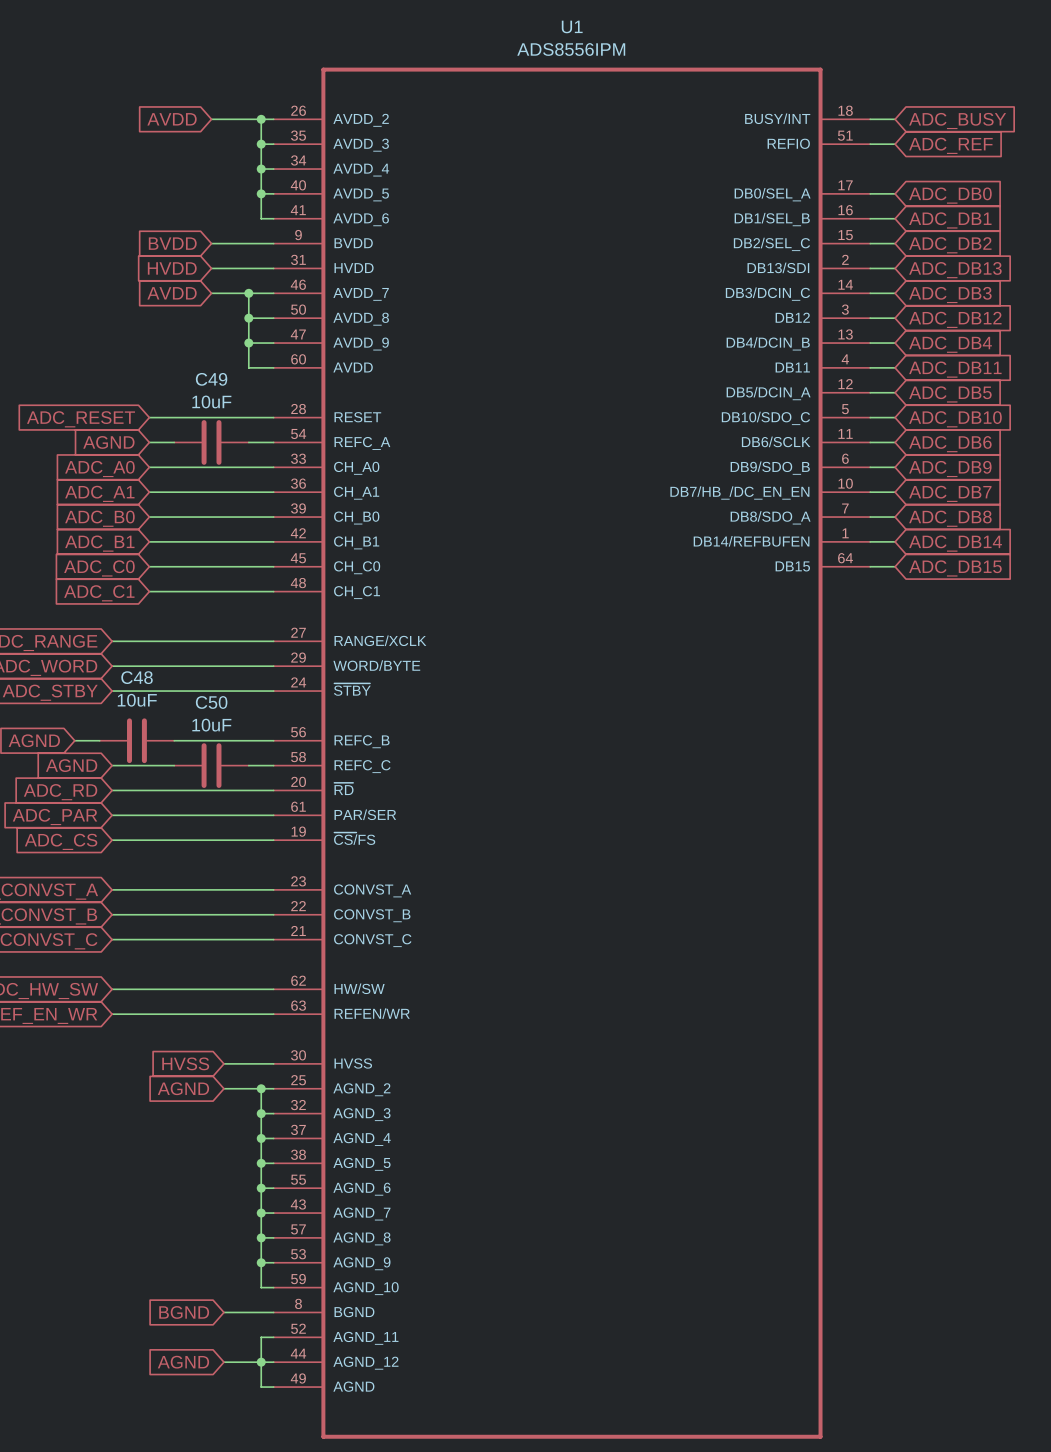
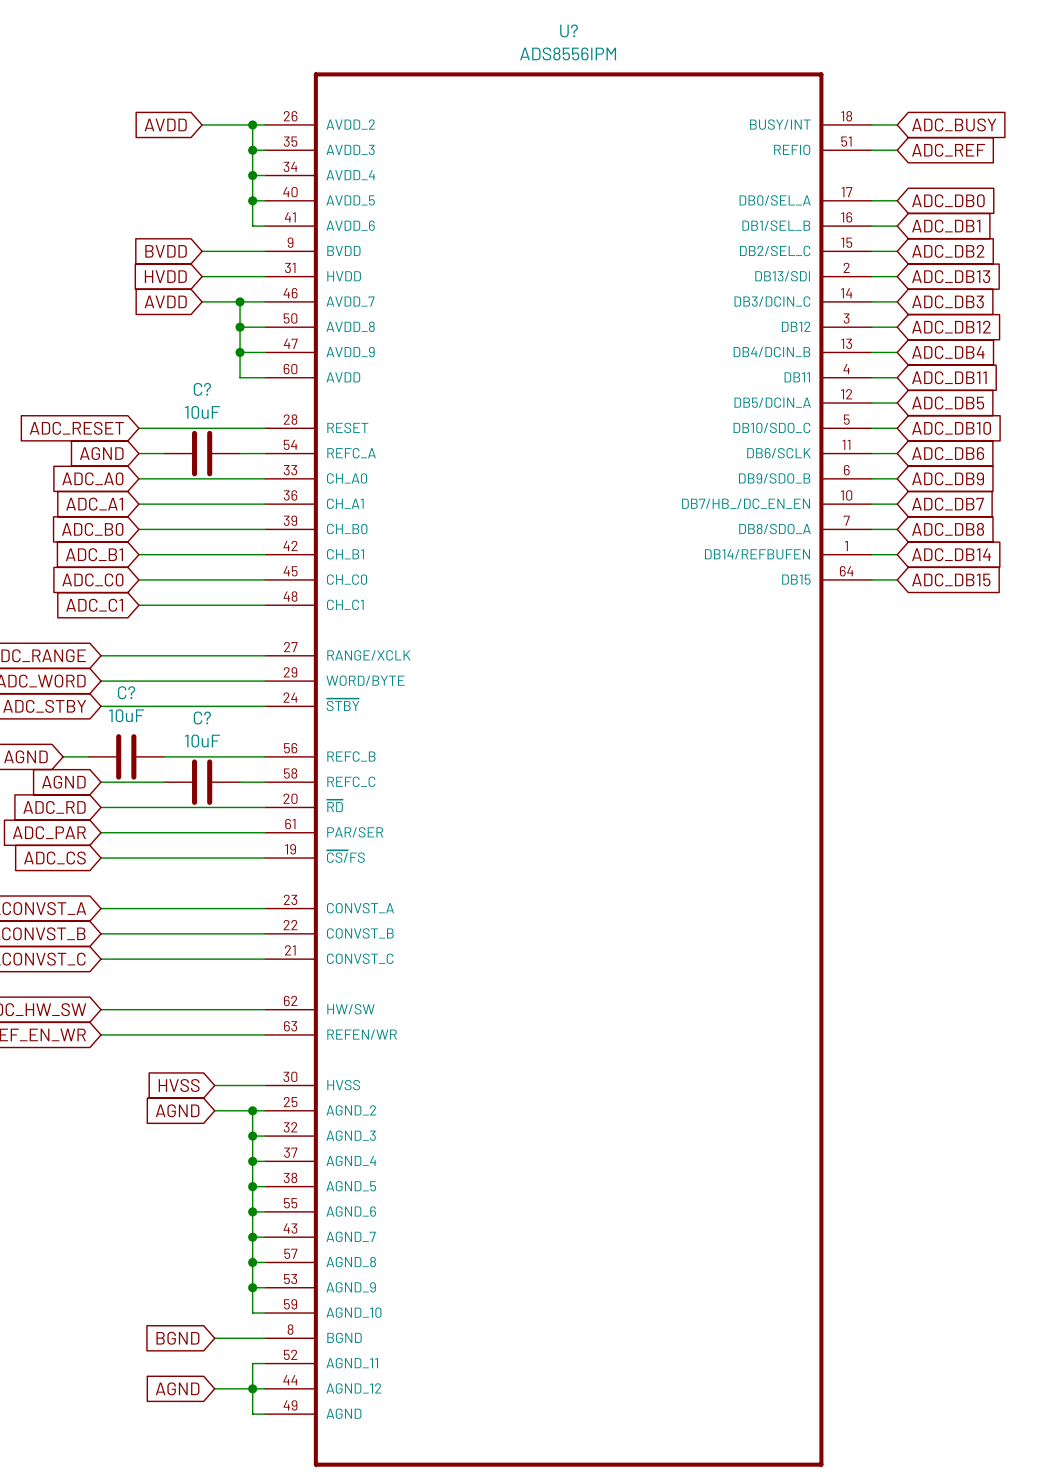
U1 name: U1 (572, 26) -> U? (569, 30)
C49 name: C49 (211, 379) -> C? (202, 389)
C48 name: C48 (137, 677) -> C? (126, 692)
C50 name: C50 (211, 702) -> C? (202, 718)

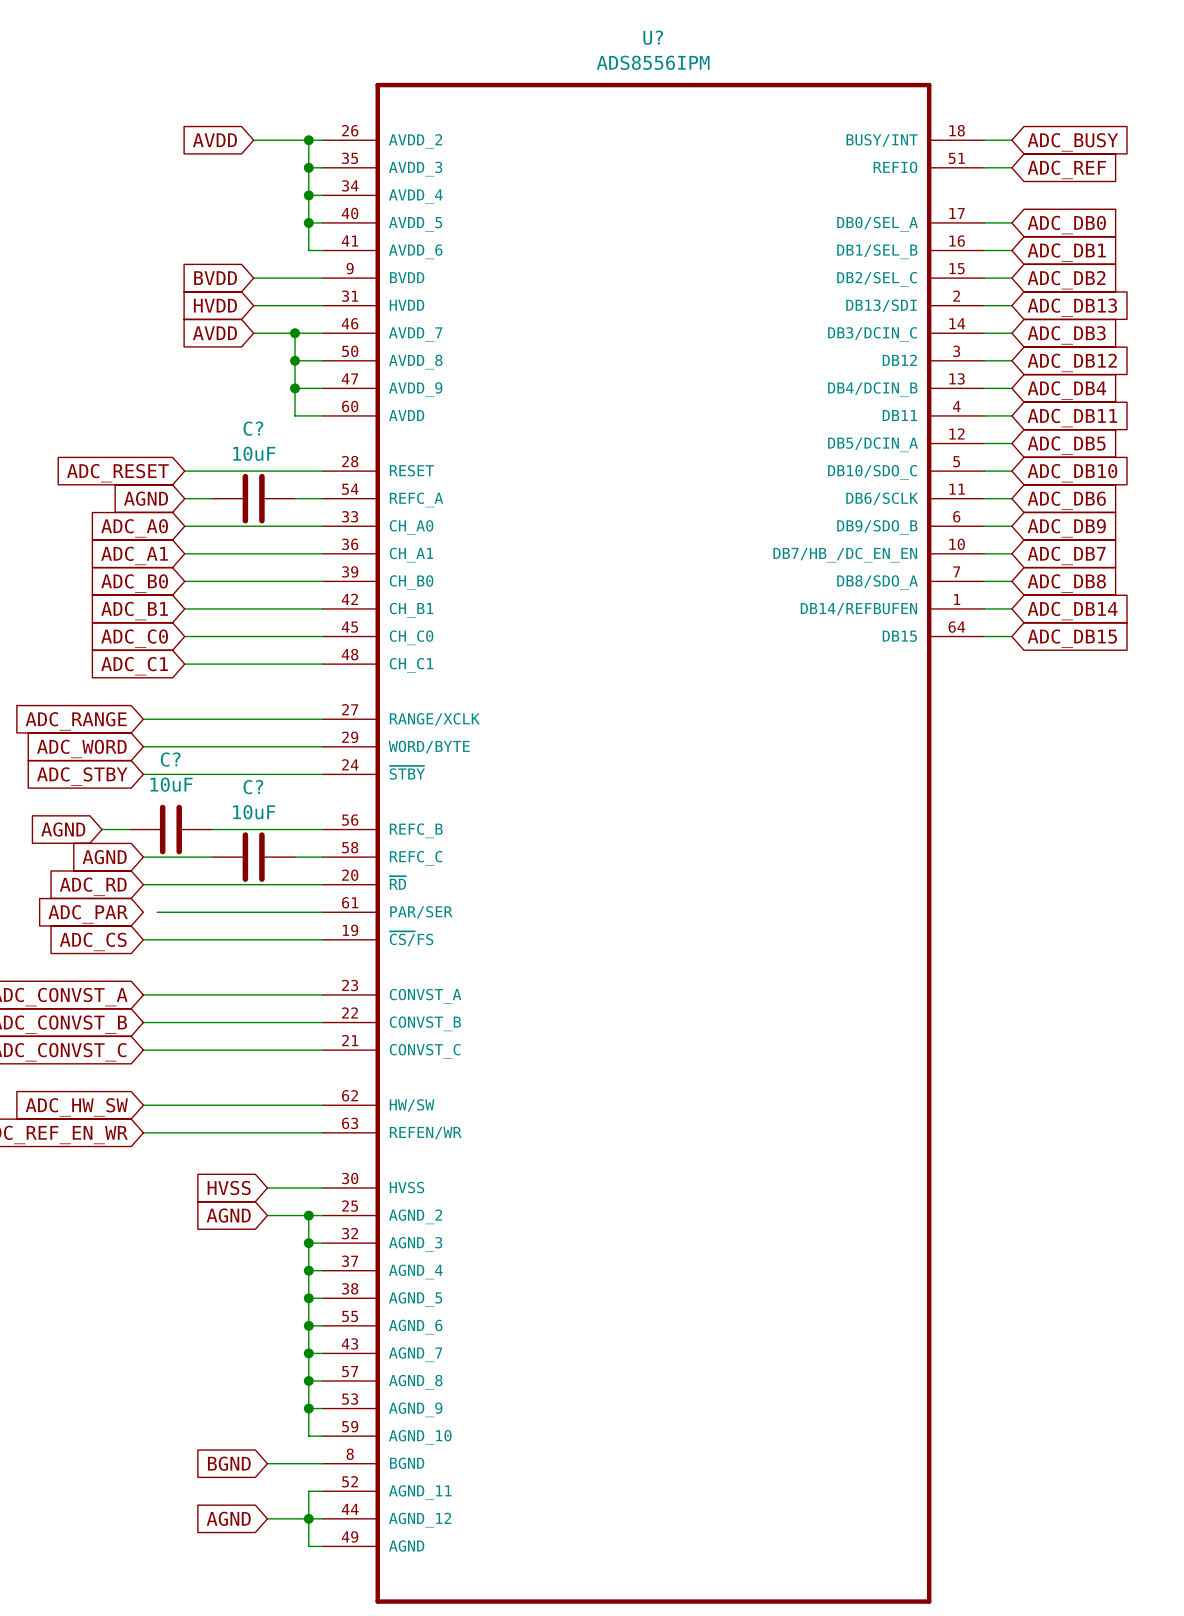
wire: (101, 832) (113, 832) -> none

